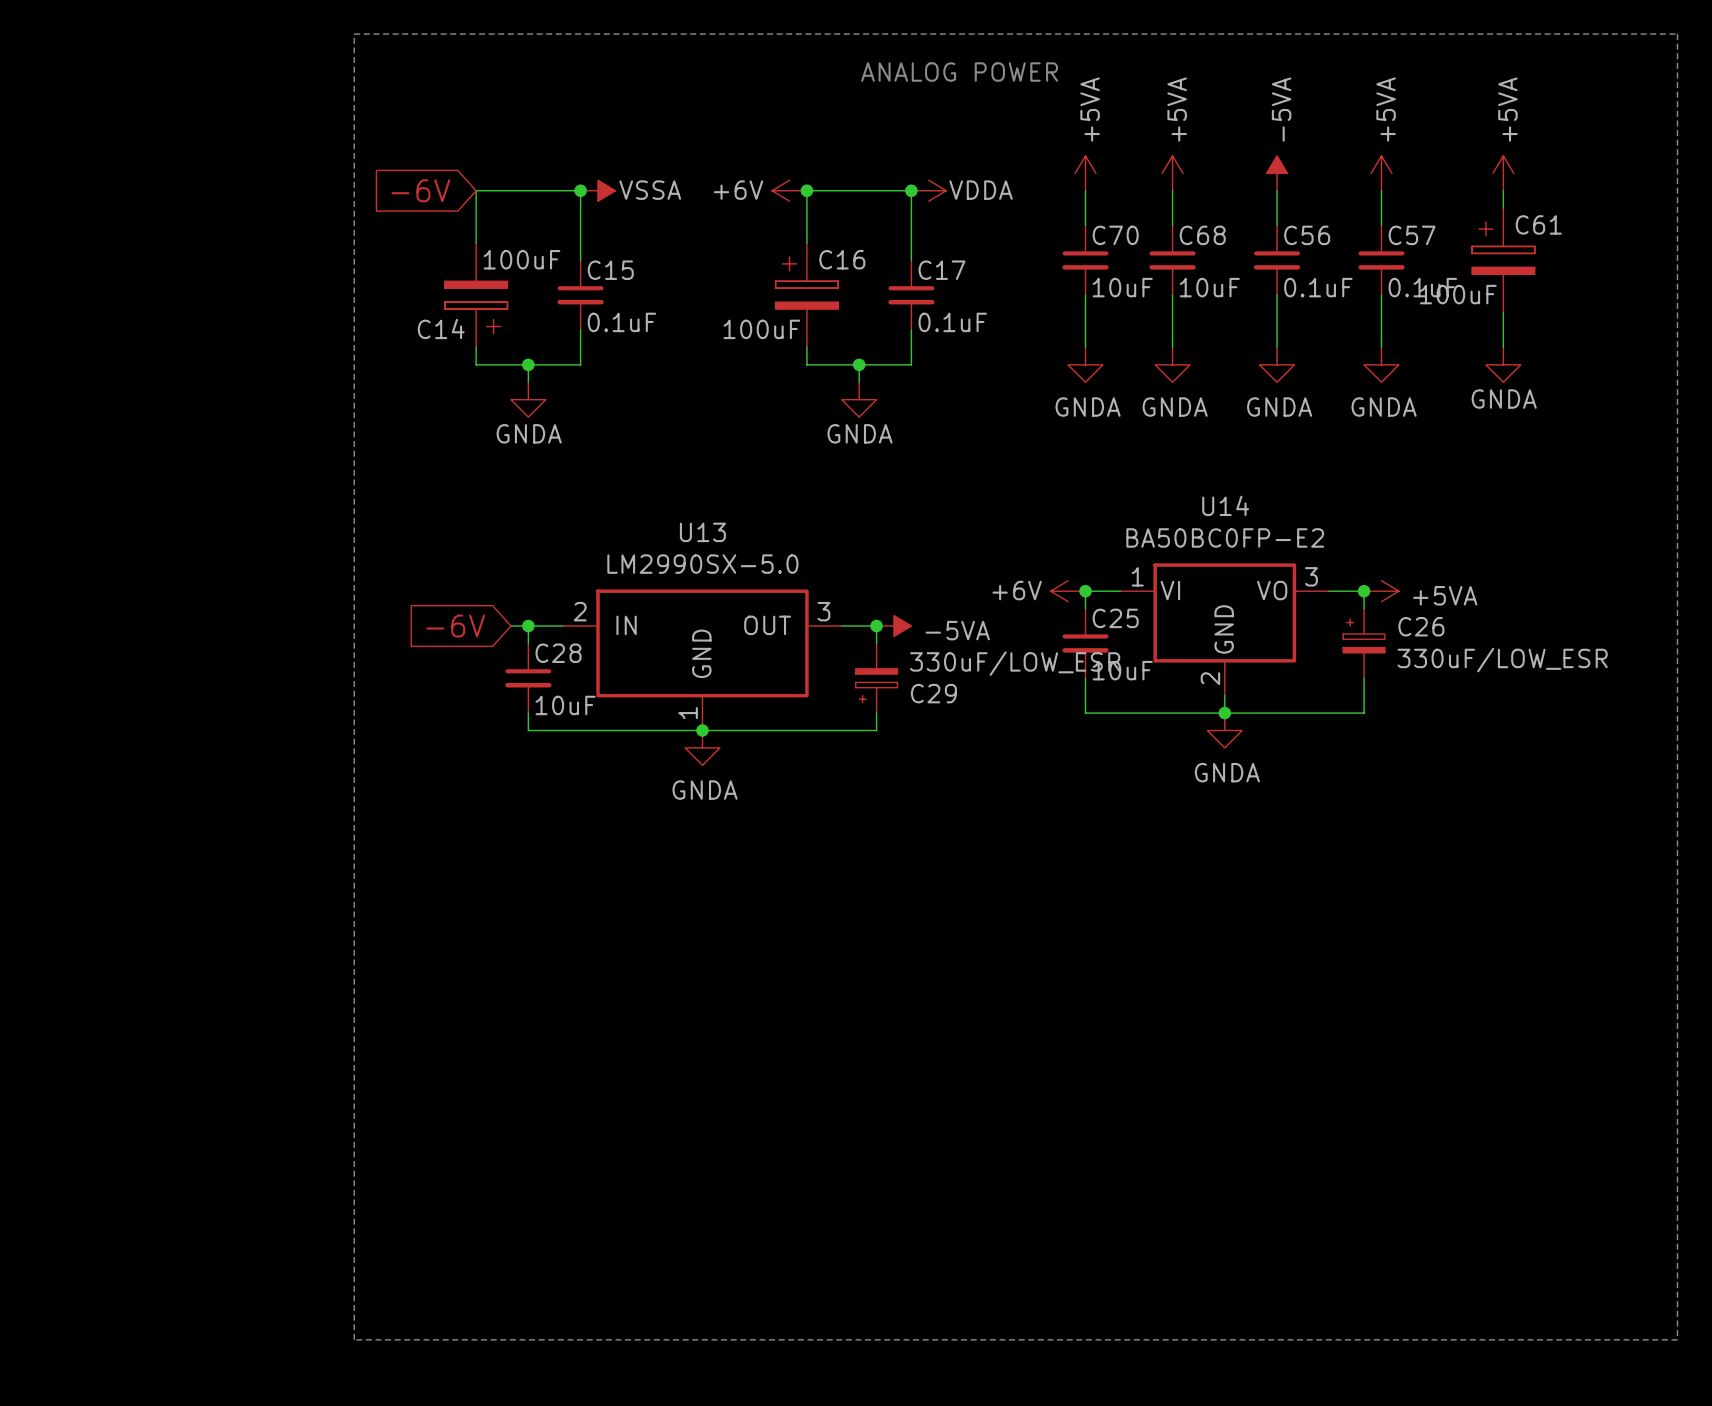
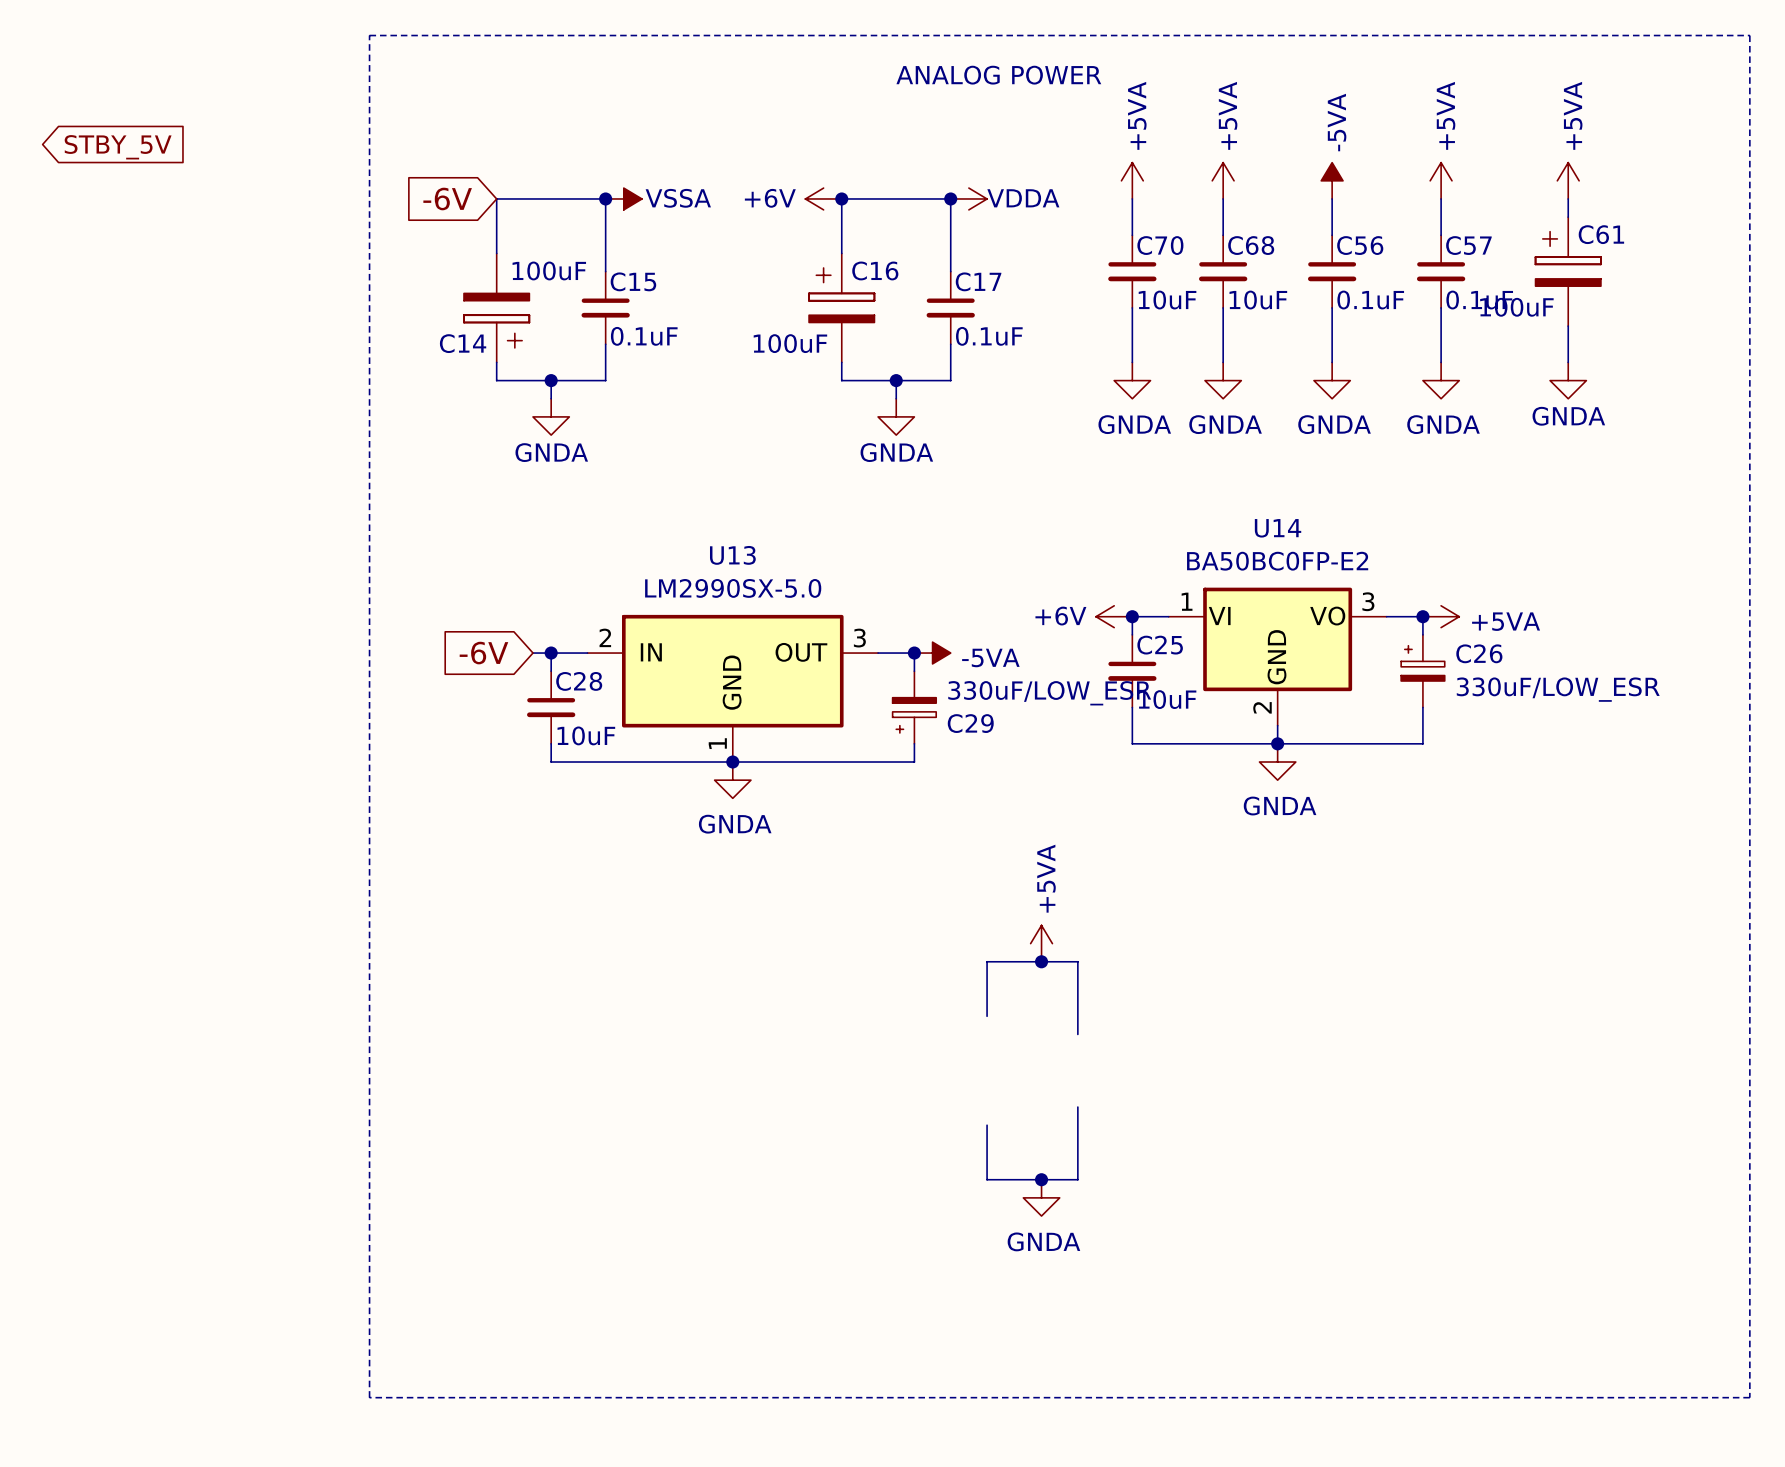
global label: none -> STBY_5V (118, 147)
power symbol: none -> +5VA (1041, 943)
junction: none -> (1041, 961)
wire: none -> (987, 1016) (987, 961) (1077, 961) (1077, 1034)
wire: none -> (1077, 1107) (1077, 1179) (987, 1179) (987, 1125)
junction: none -> (1041, 1179)
power symbol: none -> GNDA (1041, 1197)

